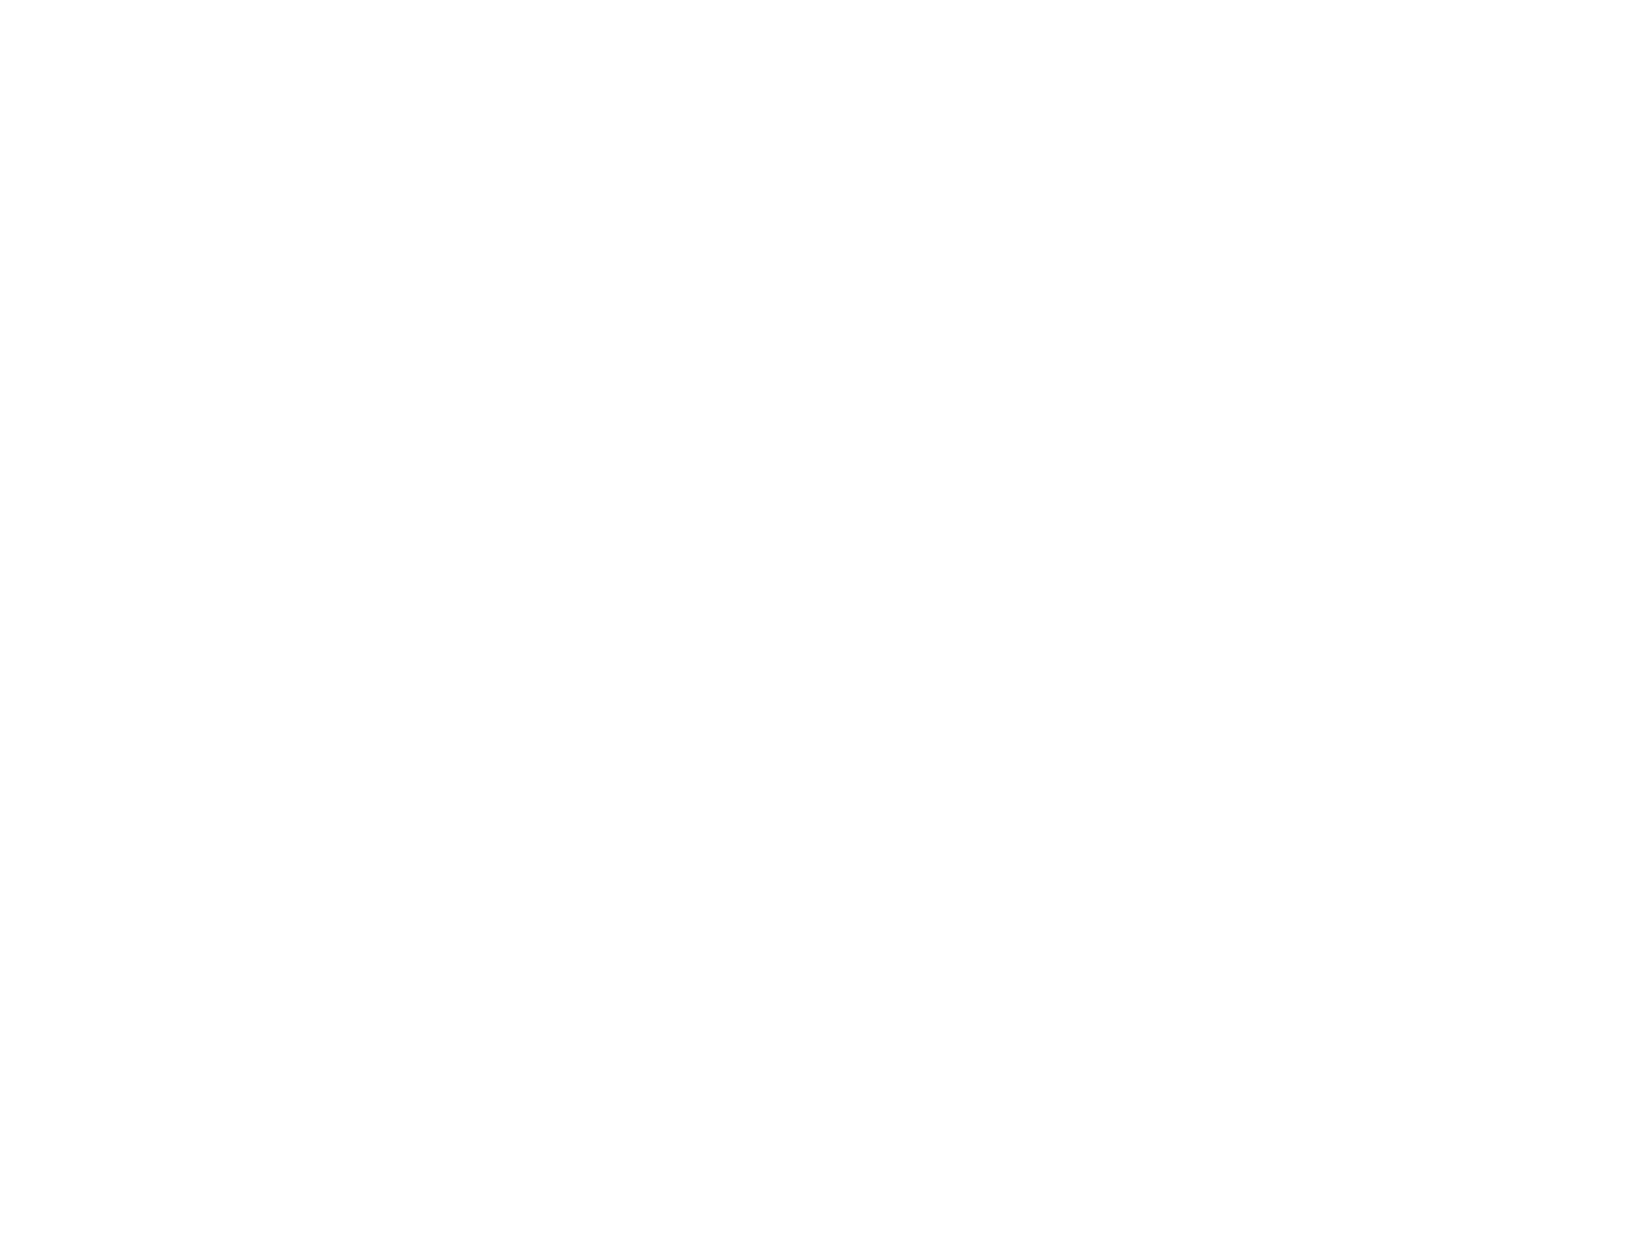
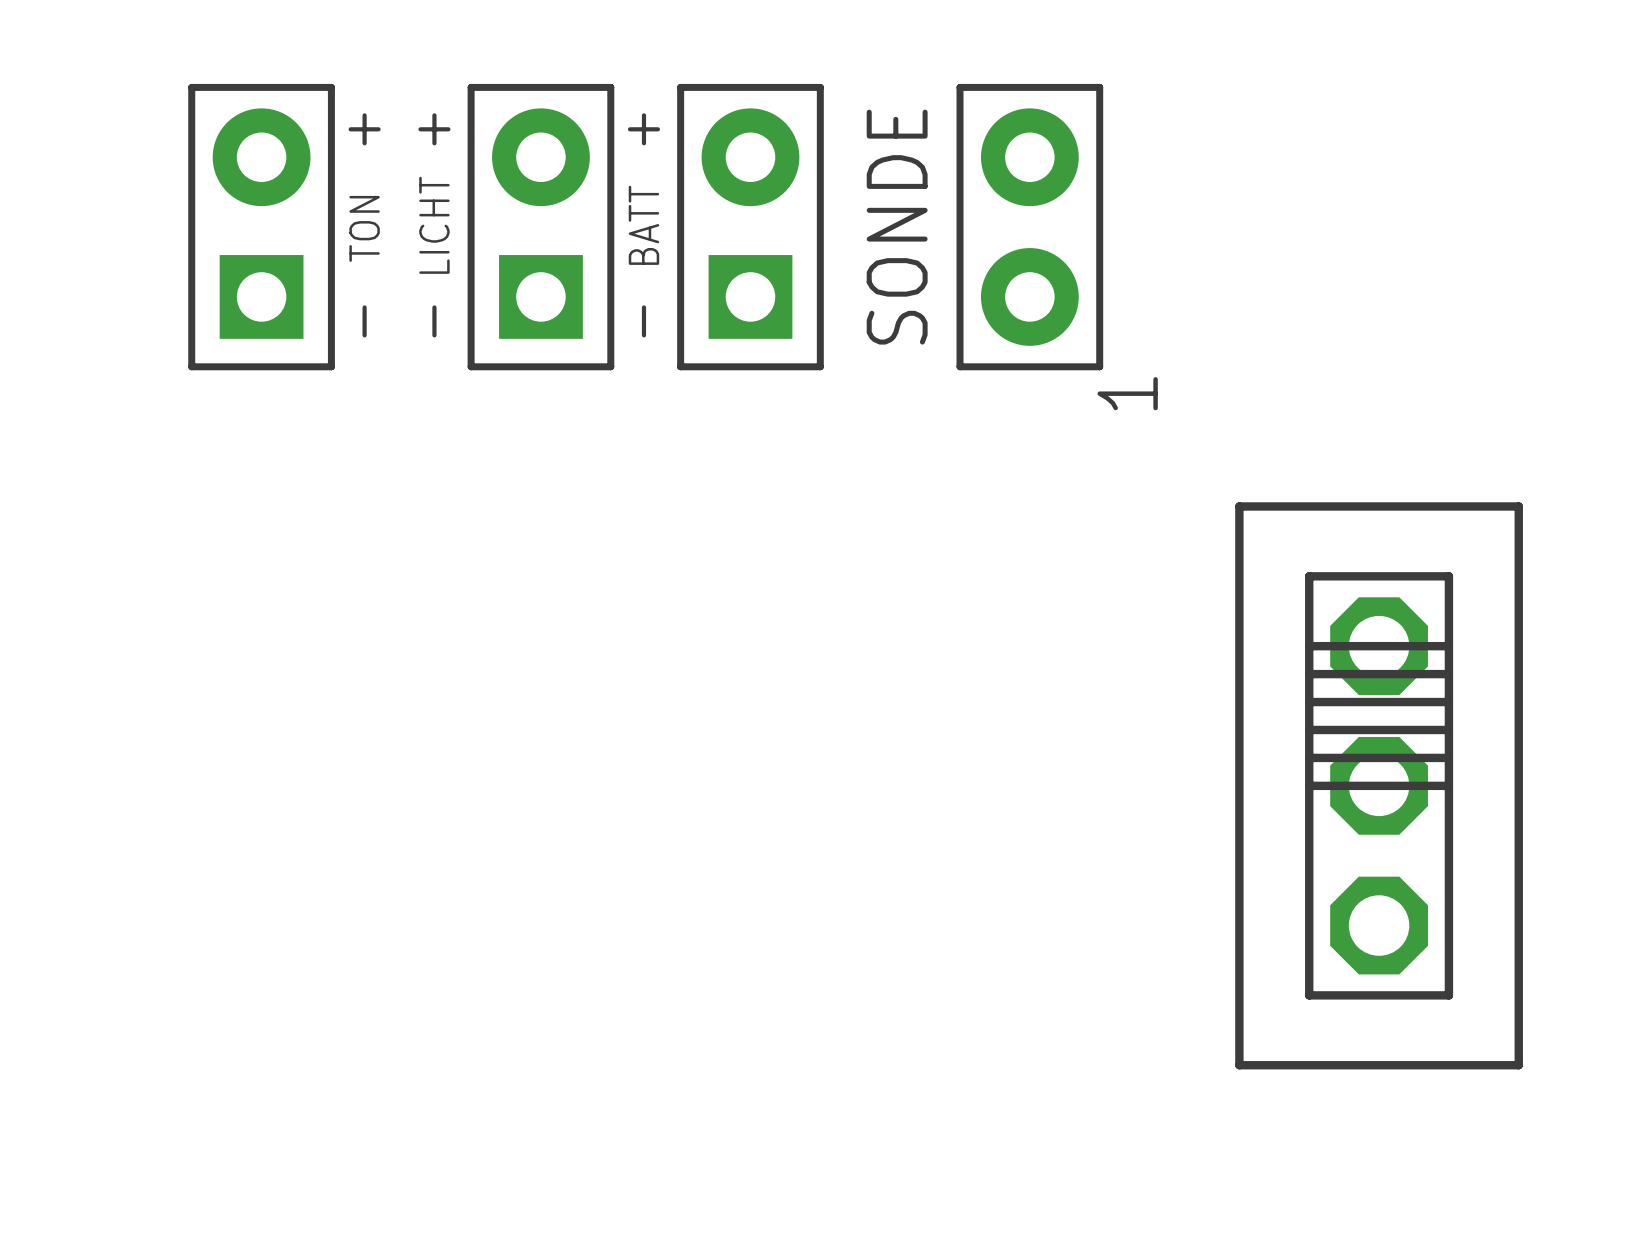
TON: none -> (284, 227)
LICHT: none -> (516, 227)
BATT: none -> (725, 227)
SONDE: none -> (1029, 227)
part: none -> (1379, 785)

